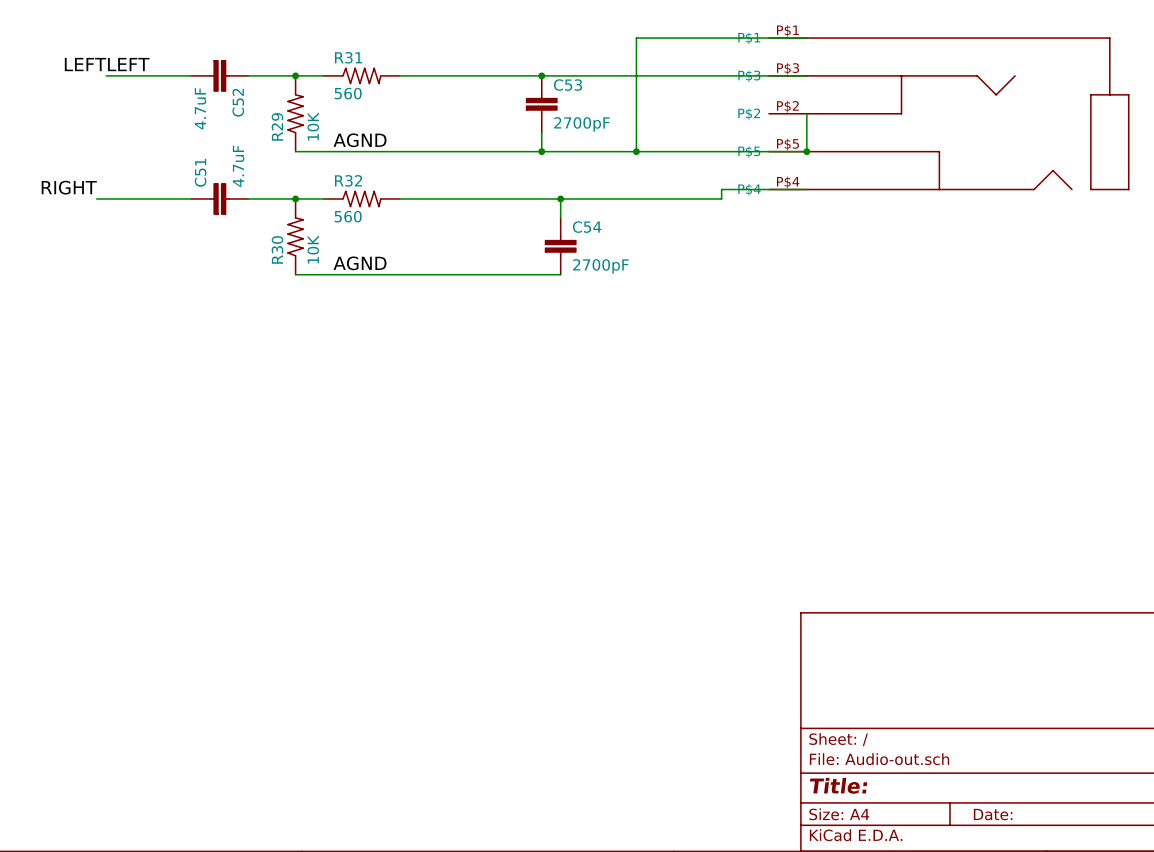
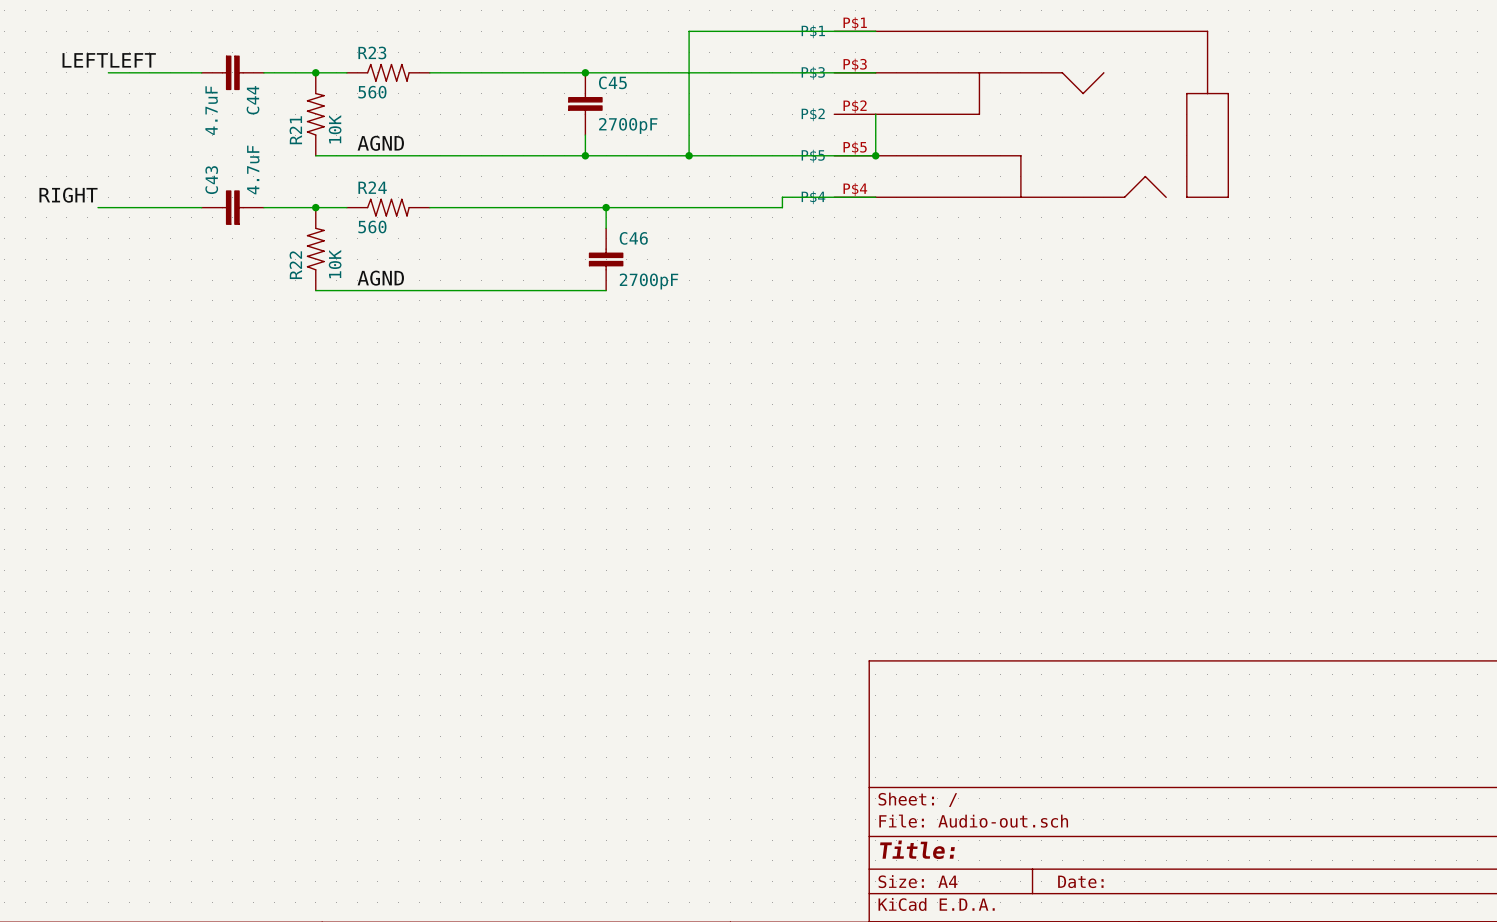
R31 name: R31 (348, 57) -> R23 (372, 52)
C53 name: C53 (568, 85) -> C45 (612, 82)
C52 name: C52 (238, 102) -> C44 (253, 100)
R29 name: R29 (277, 126) -> R21 (295, 130)
C51 name: C51 (200, 172) -> C43 (211, 180)
R32 name: R32 (348, 180) -> R24 (372, 187)
C54 name: C54 (587, 227) -> C46 (633, 238)
R30 name: R30 (277, 249) -> R22 (295, 265)

